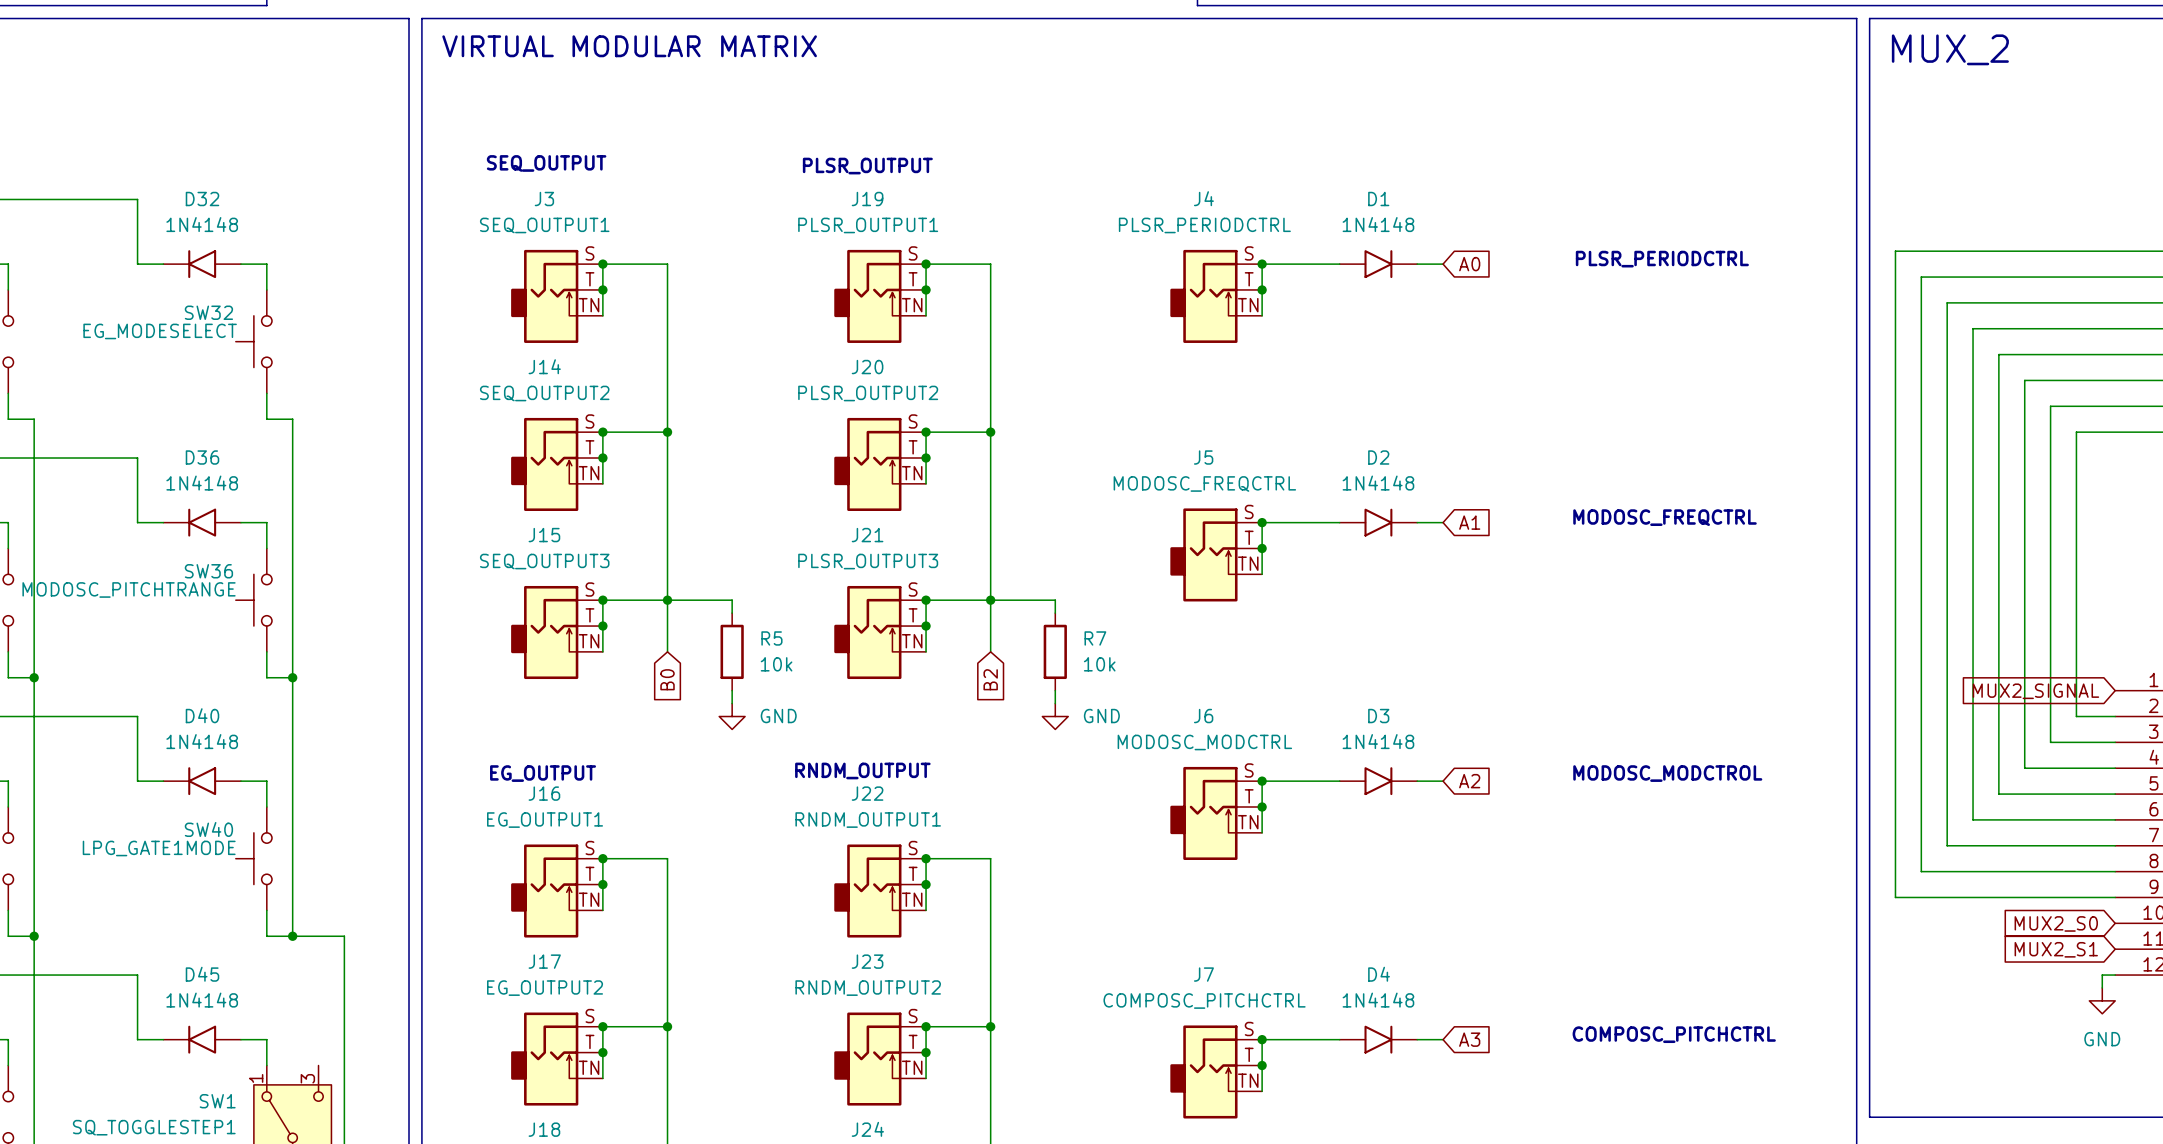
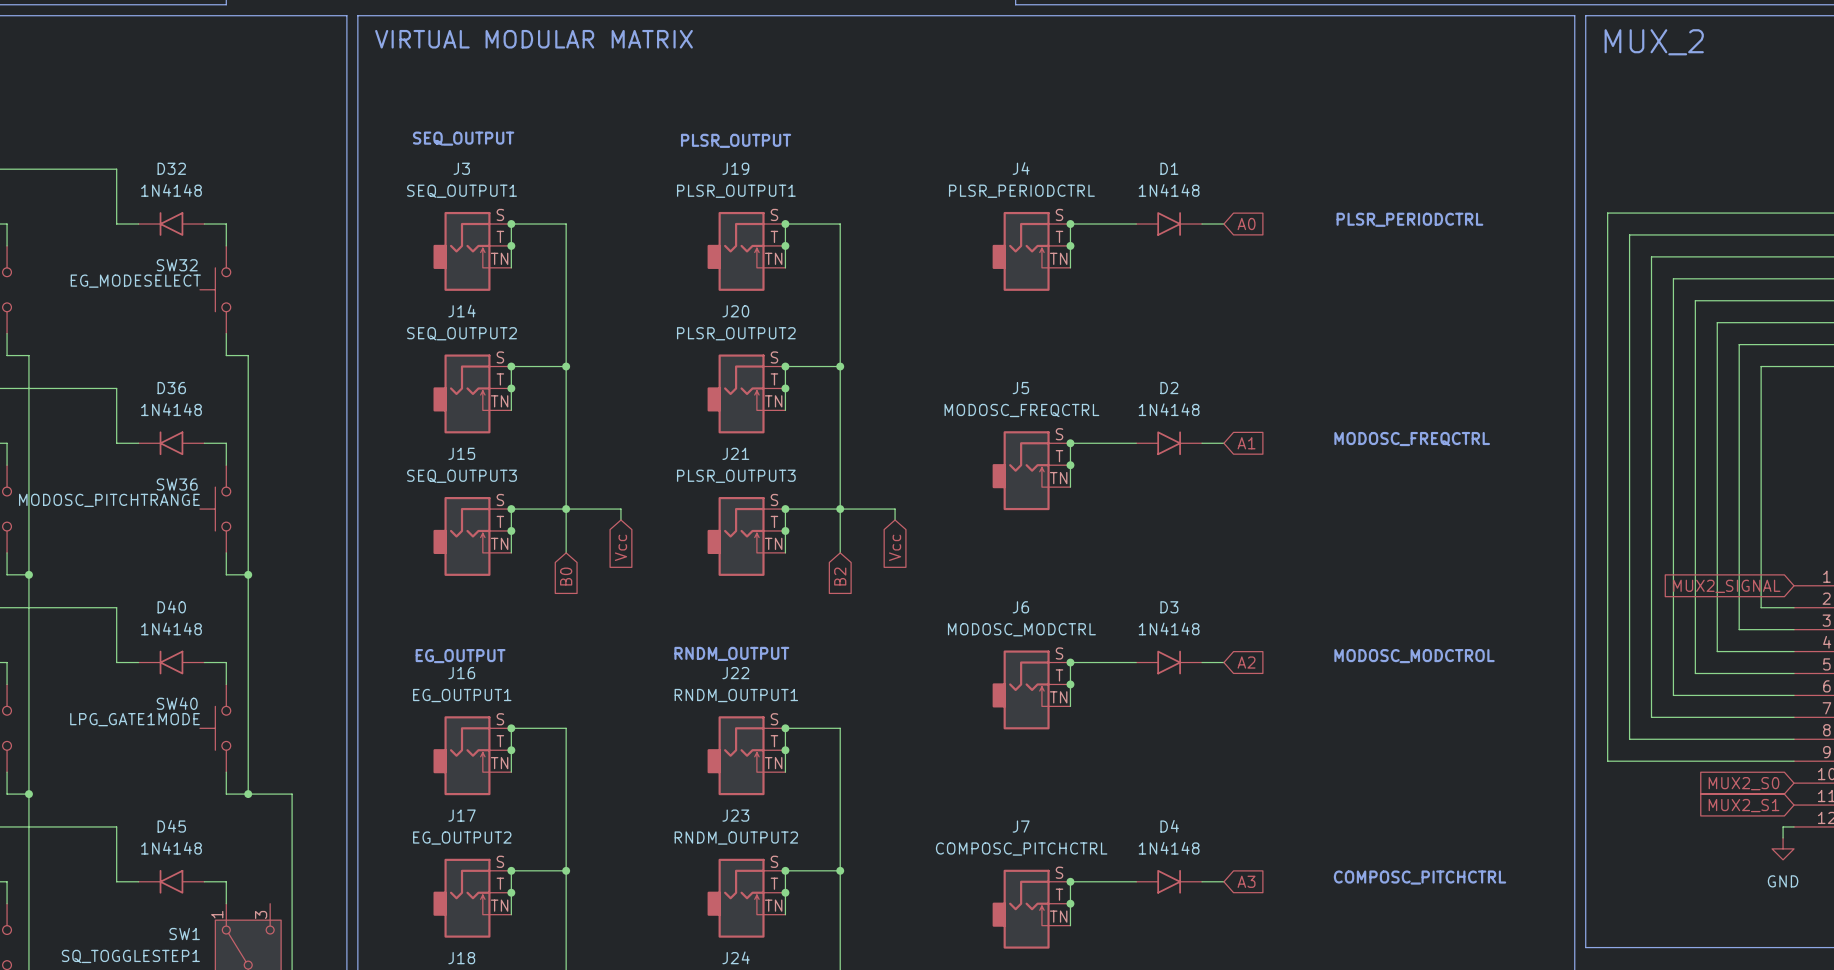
global label: none -> Vcc (620, 547)
global label: none -> Vcc (895, 547)
R5: 10k (732, 651) -> none
R7: 10k (1055, 651) -> none
wire: (732, 690) (732, 703) -> none
wire: (1055, 690) (1055, 703) -> none
power symbol: GND (732, 716) -> none
power symbol: GND (1055, 716) -> none

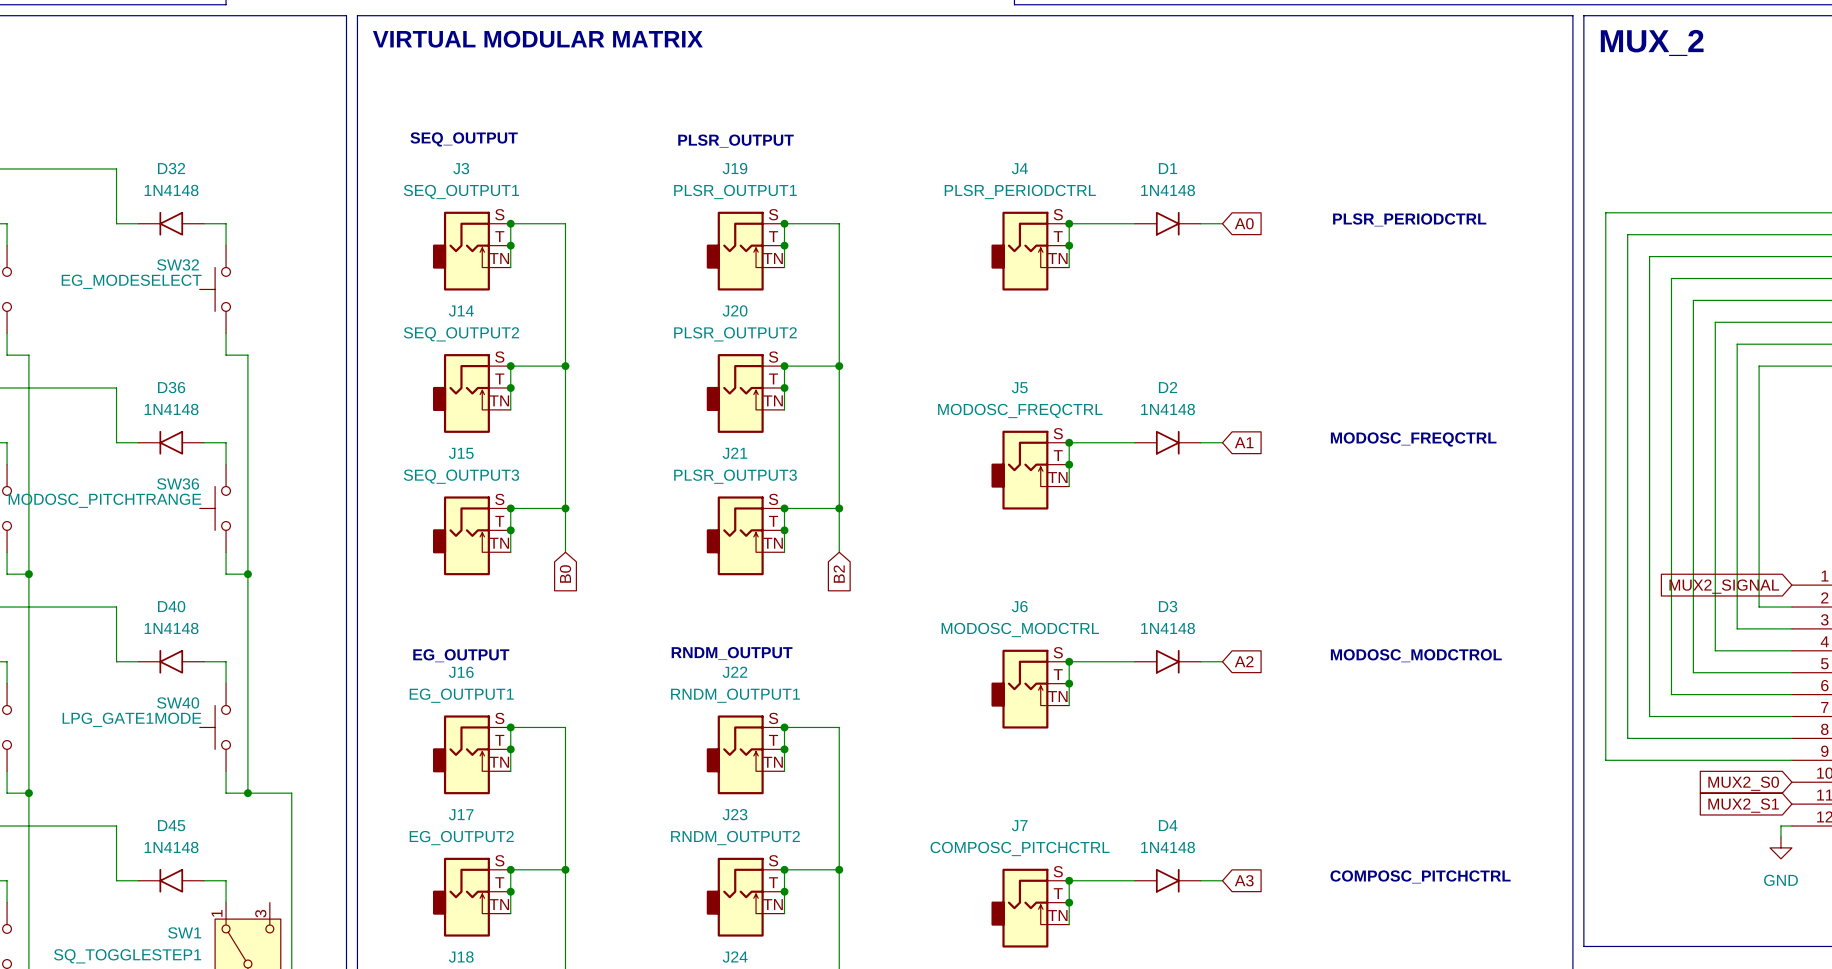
wire: (566, 509) (620, 509) (620, 520) -> none
wire: (840, 509) (895, 509) (895, 520) -> none
global label: Vcc (620, 547) -> none
global label: Vcc (895, 547) -> none

